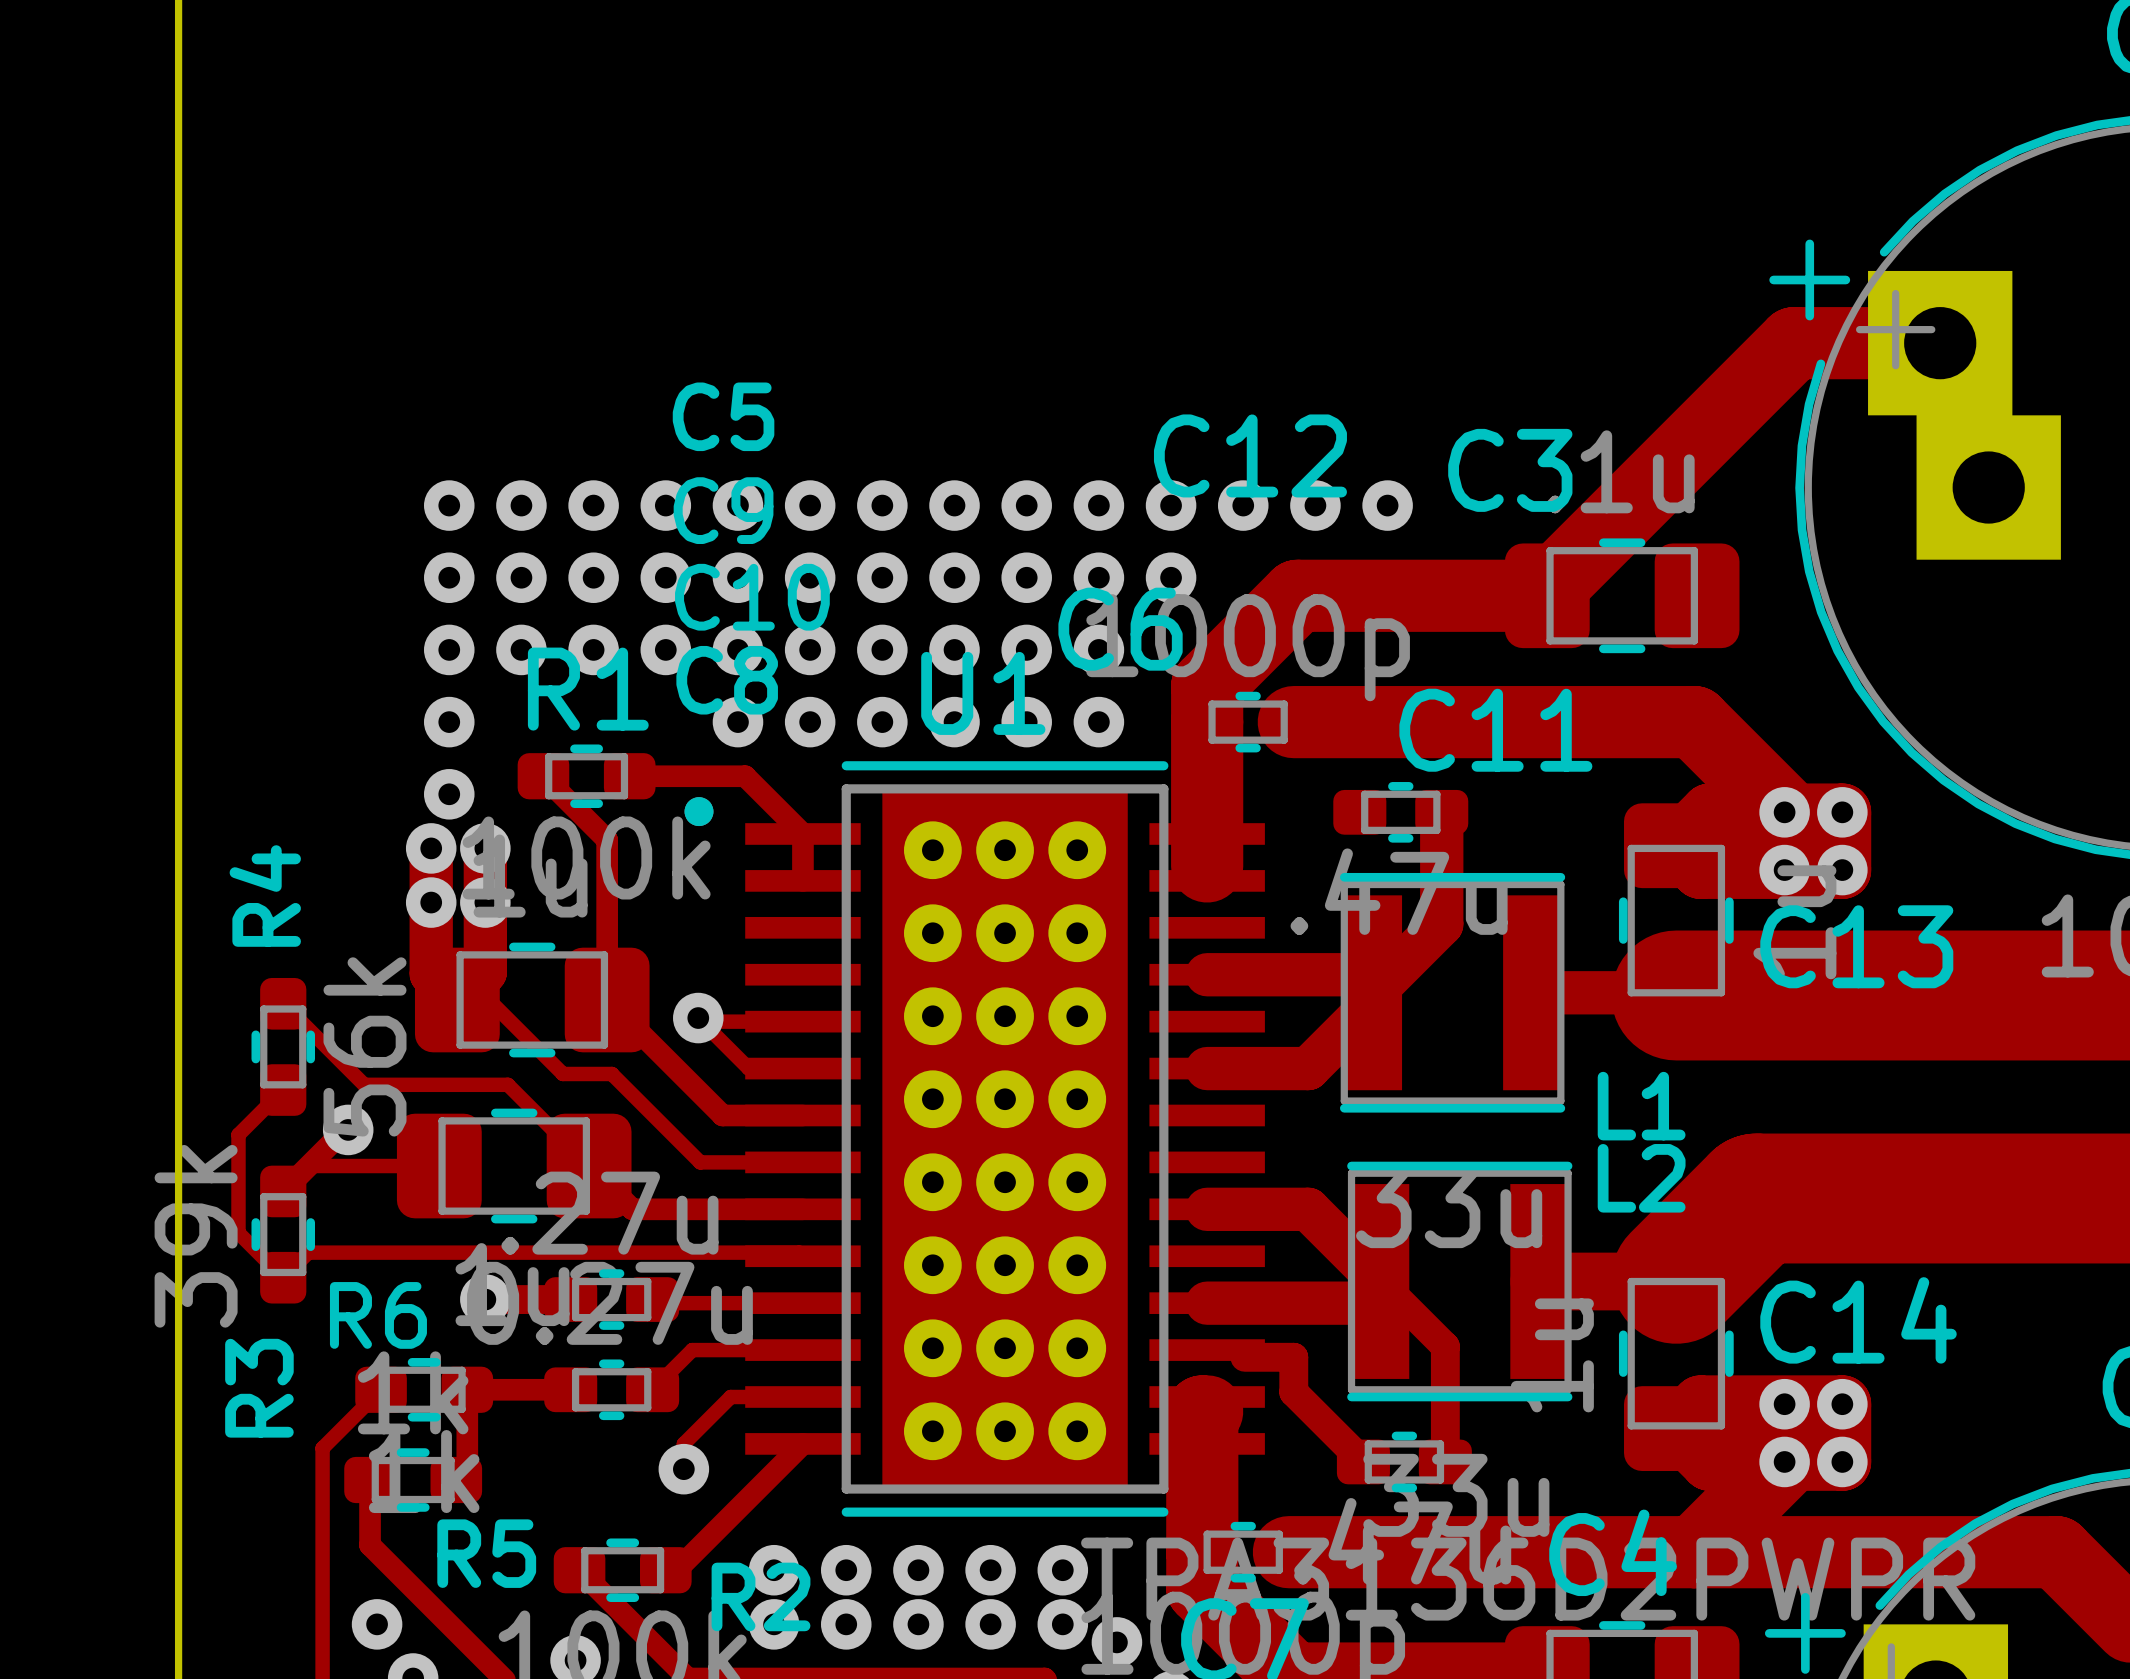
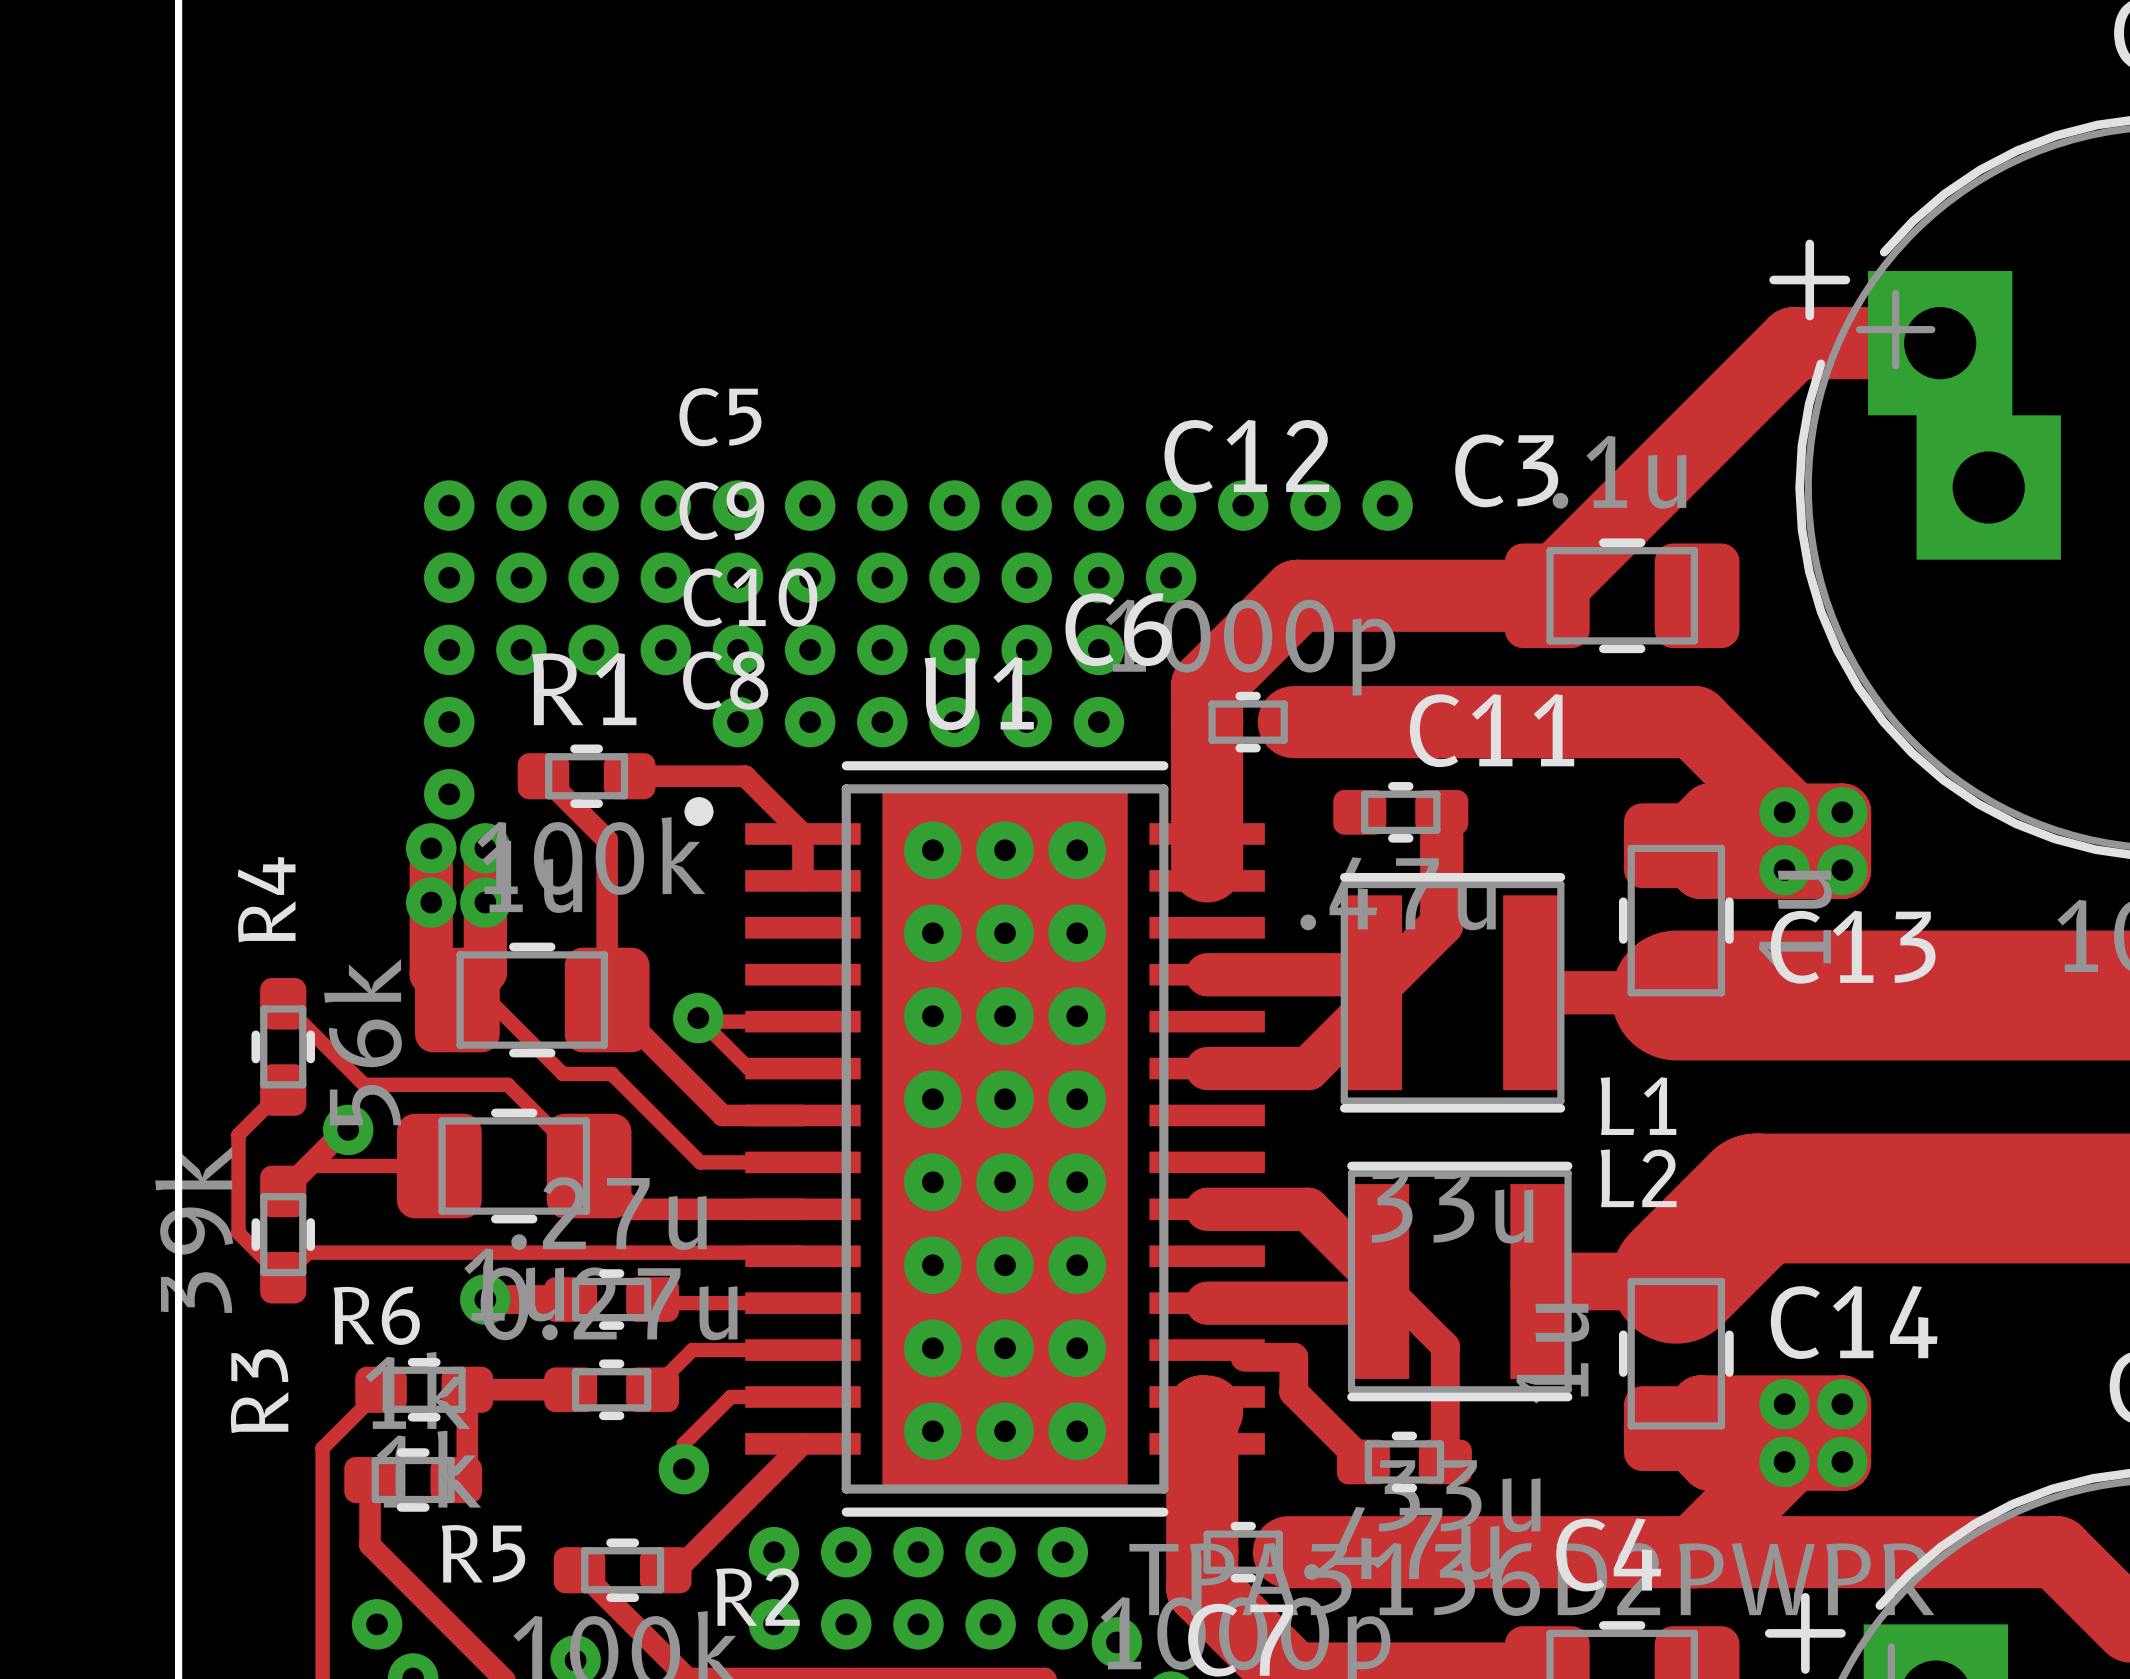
via position: (774, 1570) -> (774, 1552)
via position: (846, 1570) -> (846, 1552)
via position: (918, 1570) -> (918, 1552)
via position: (990, 1570) -> (990, 1552)
via position: (1062, 1570) -> (1062, 1552)

